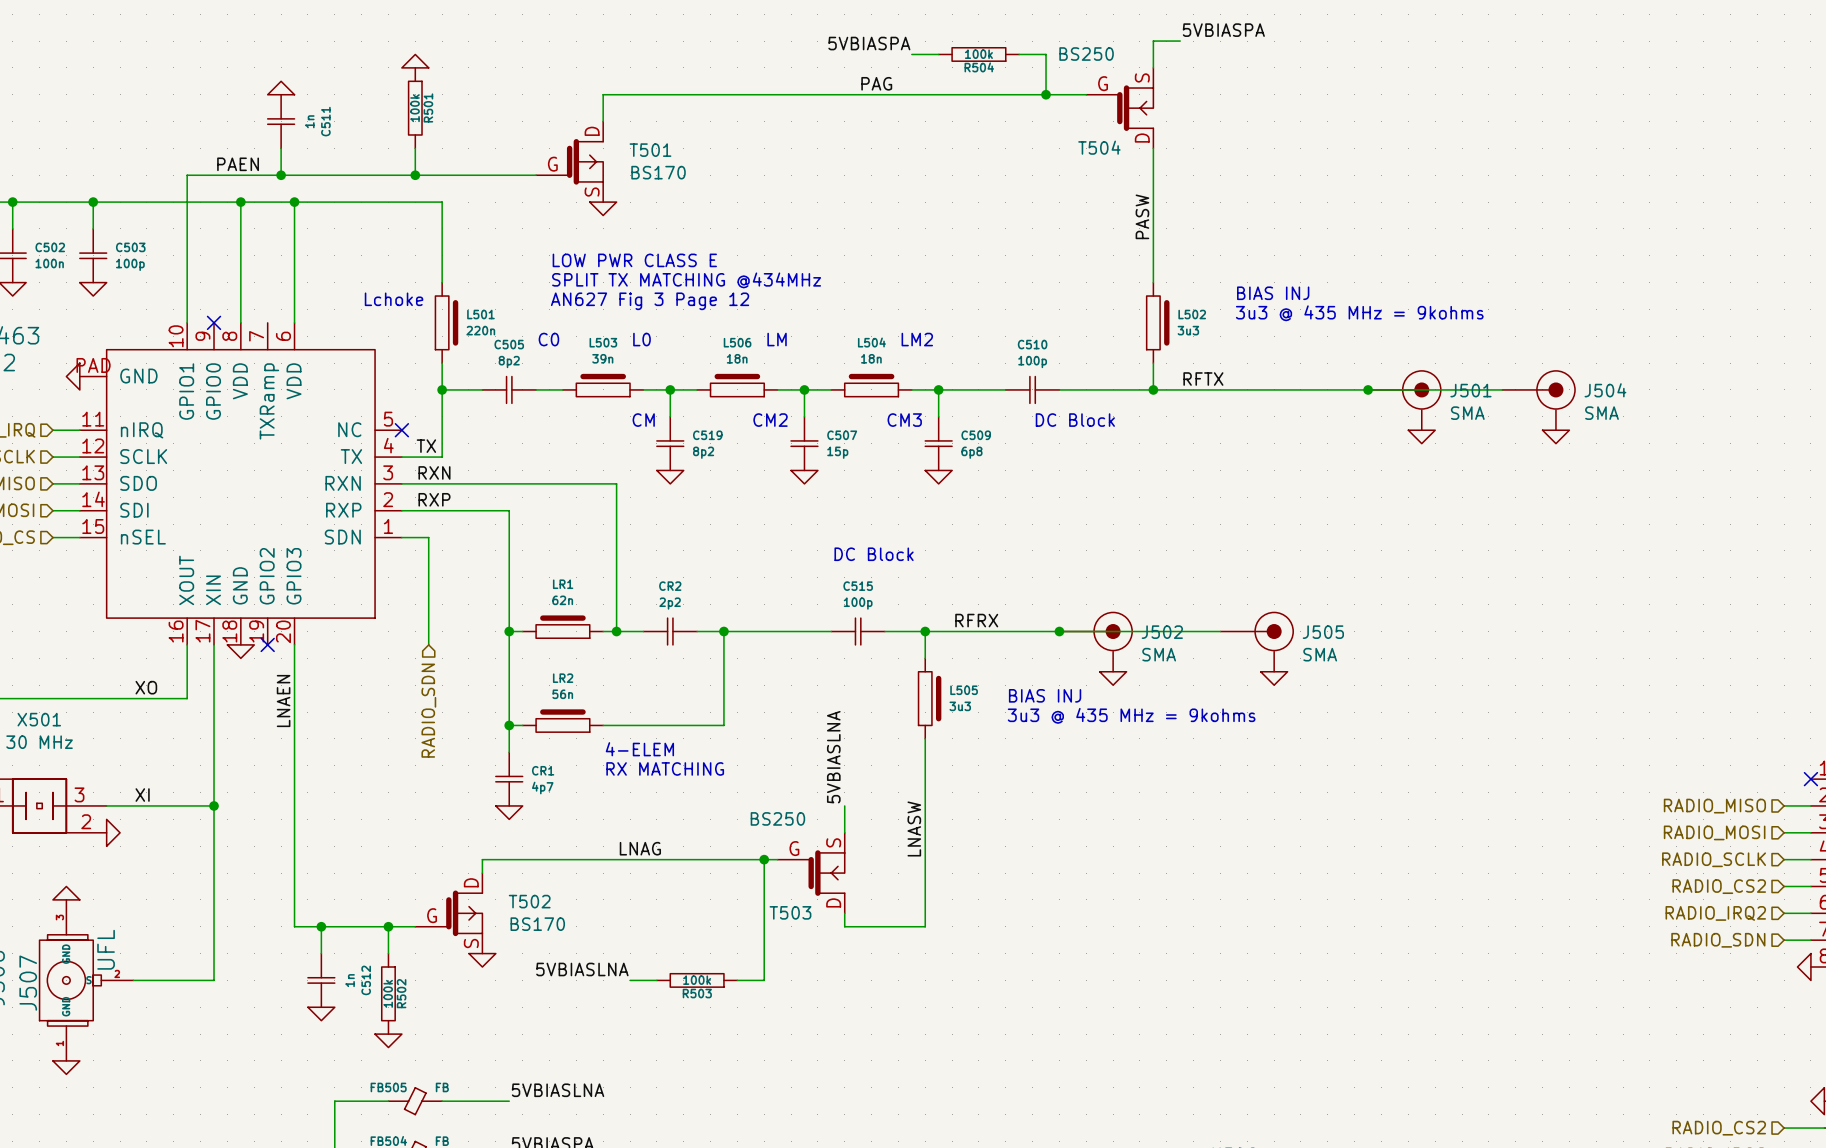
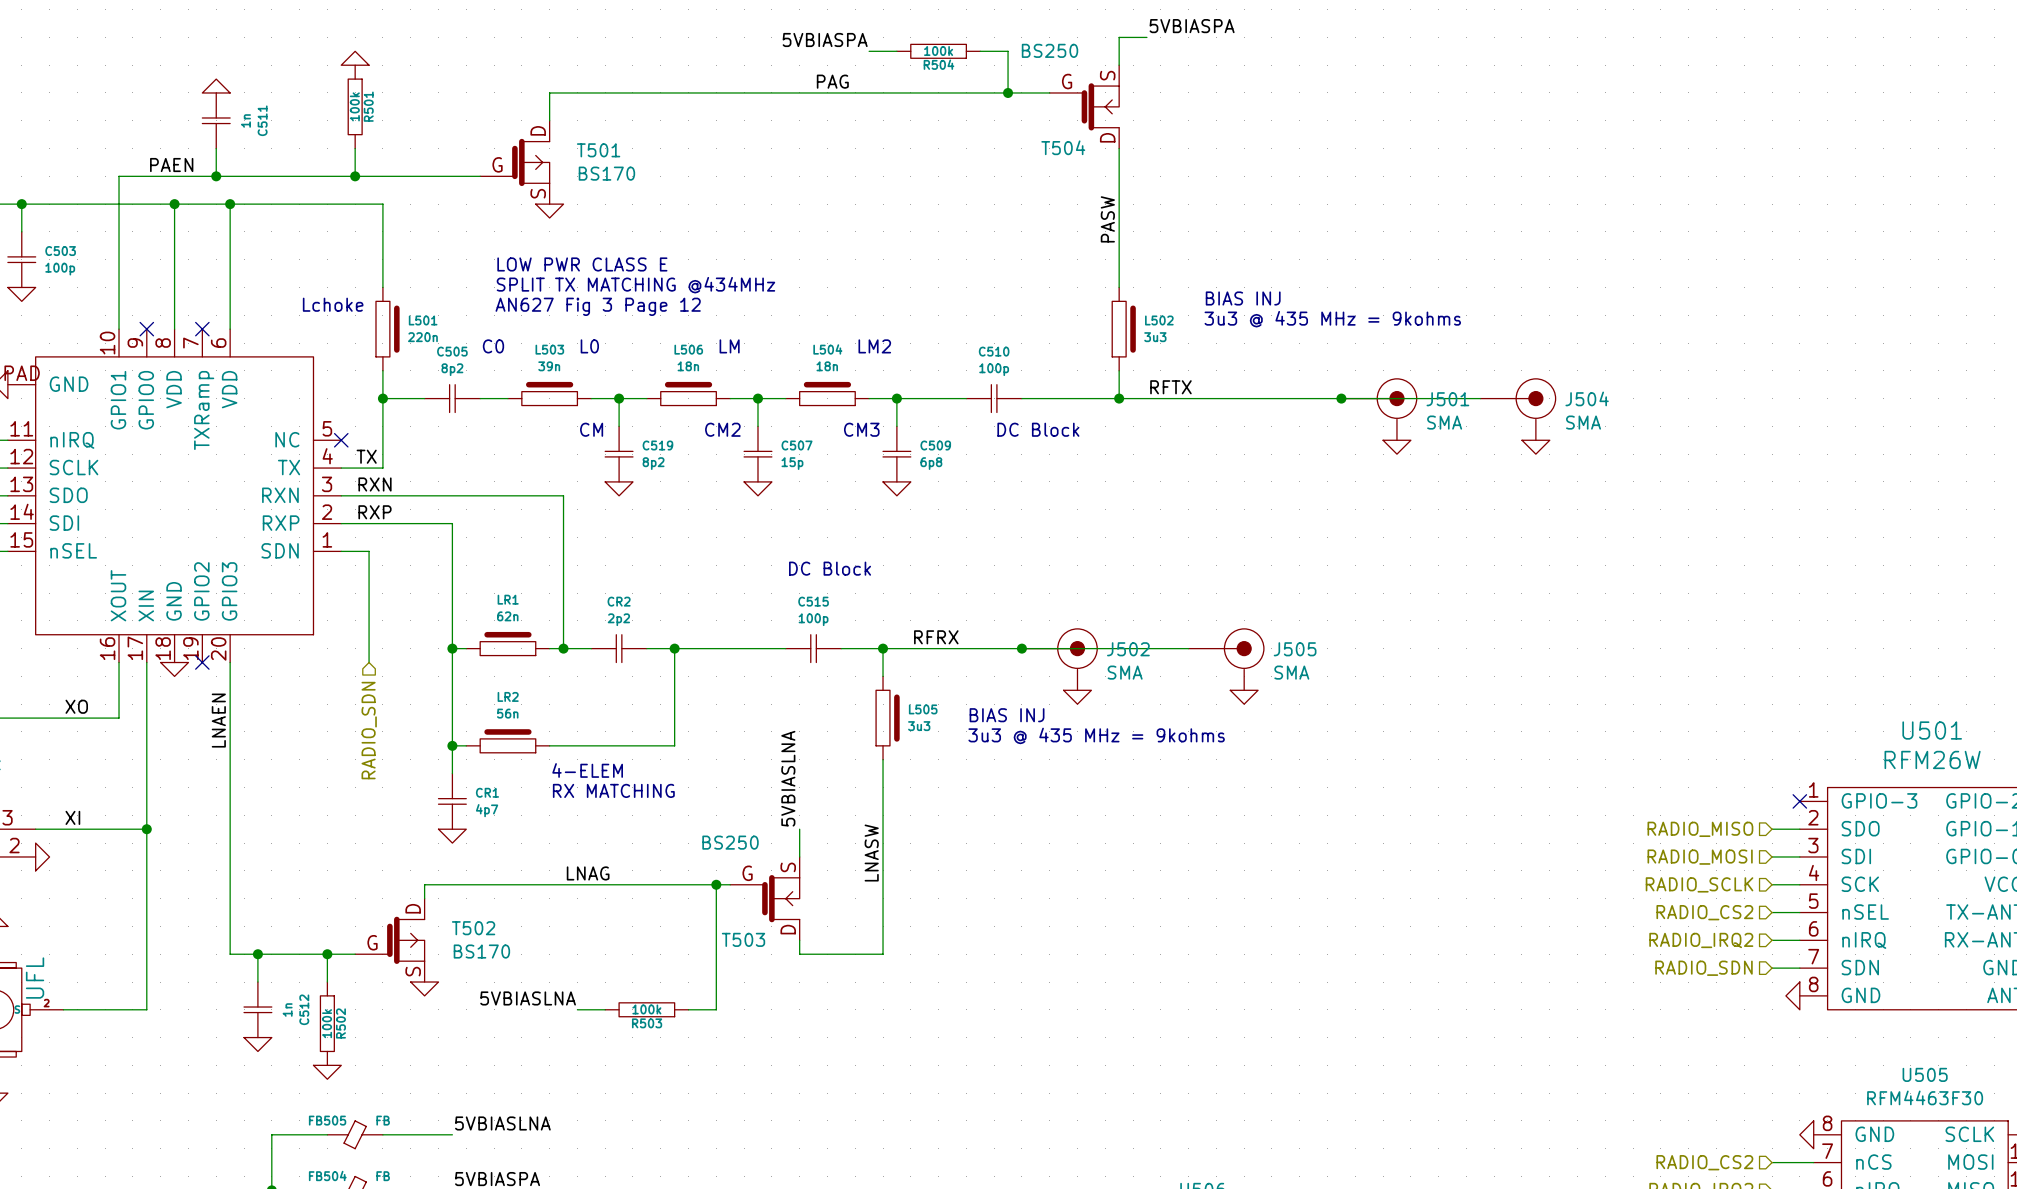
no-connect mark: none -> (202, 329)

